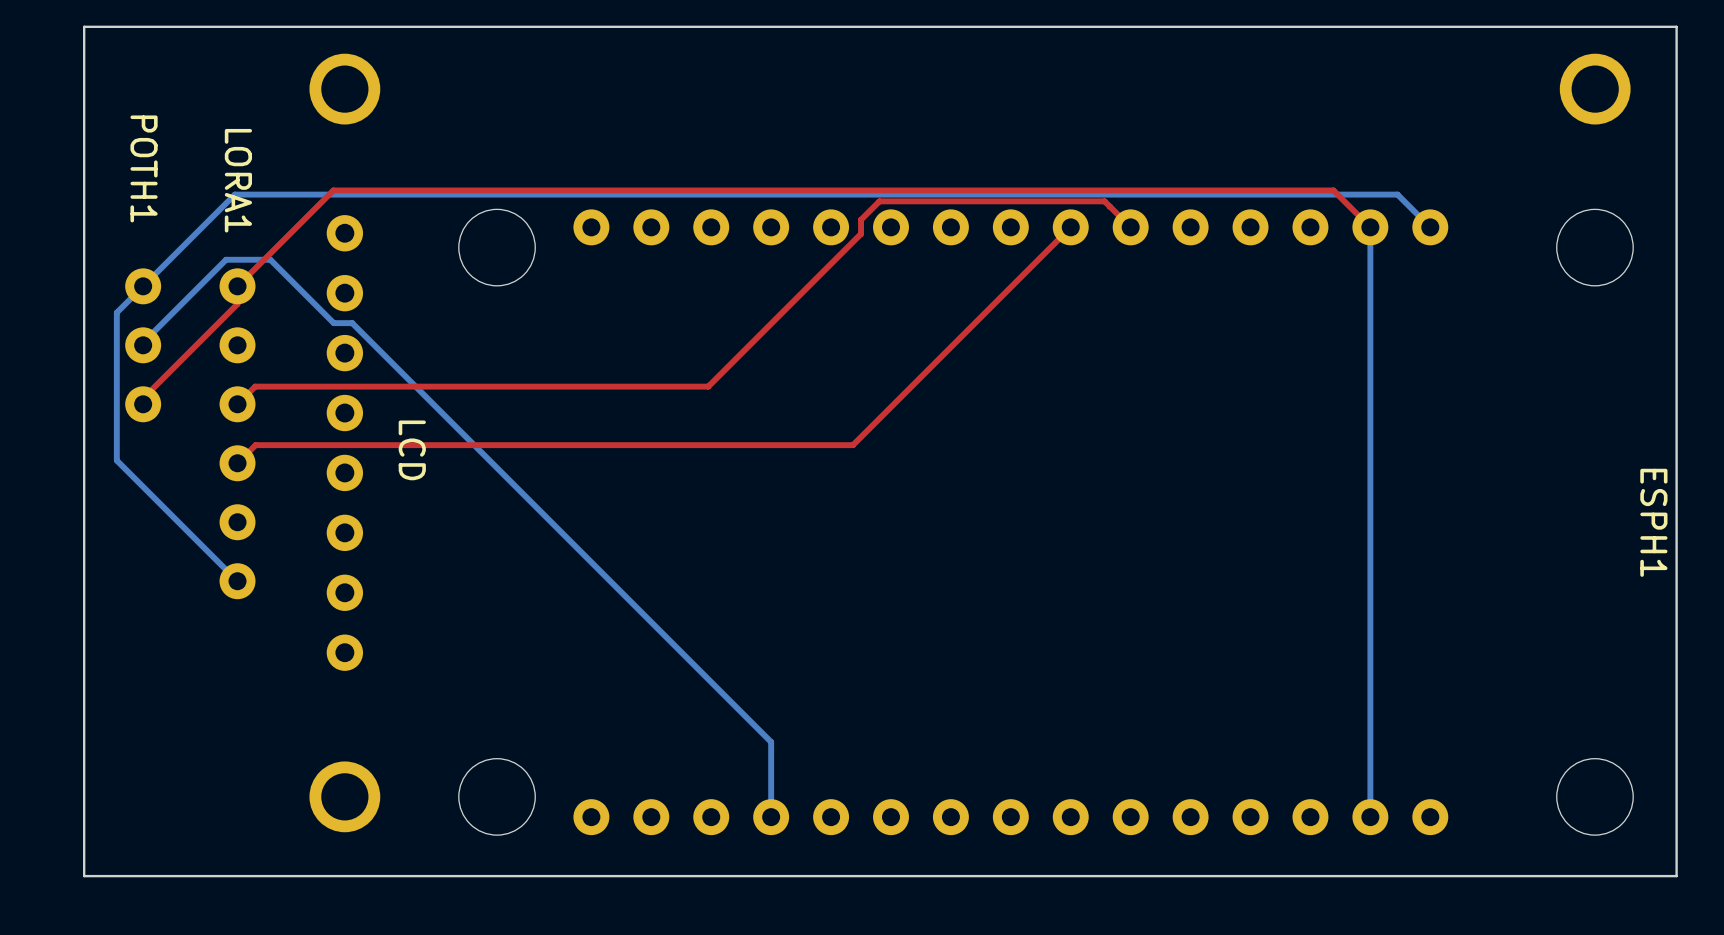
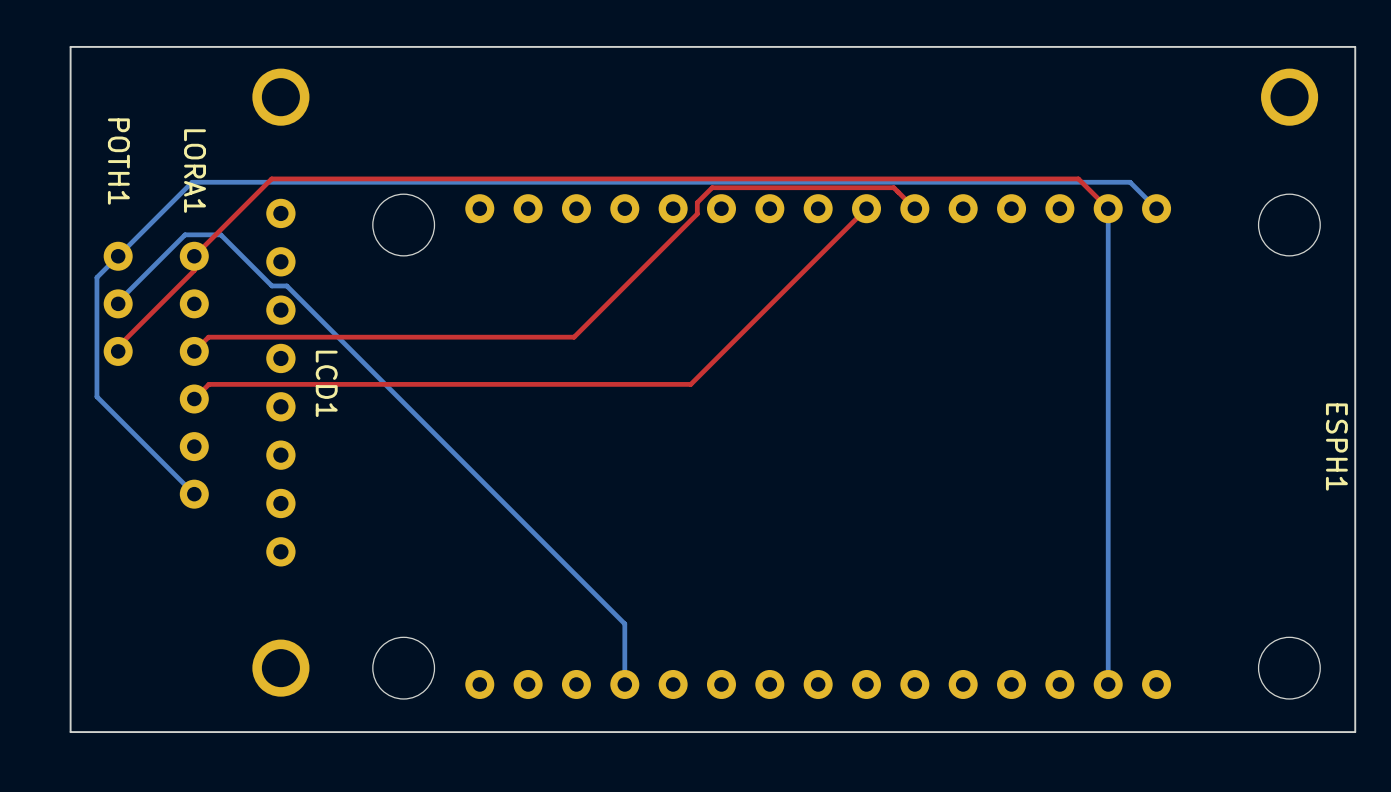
LCD name: LCD (412, 450) -> LCD1 (326, 383)

